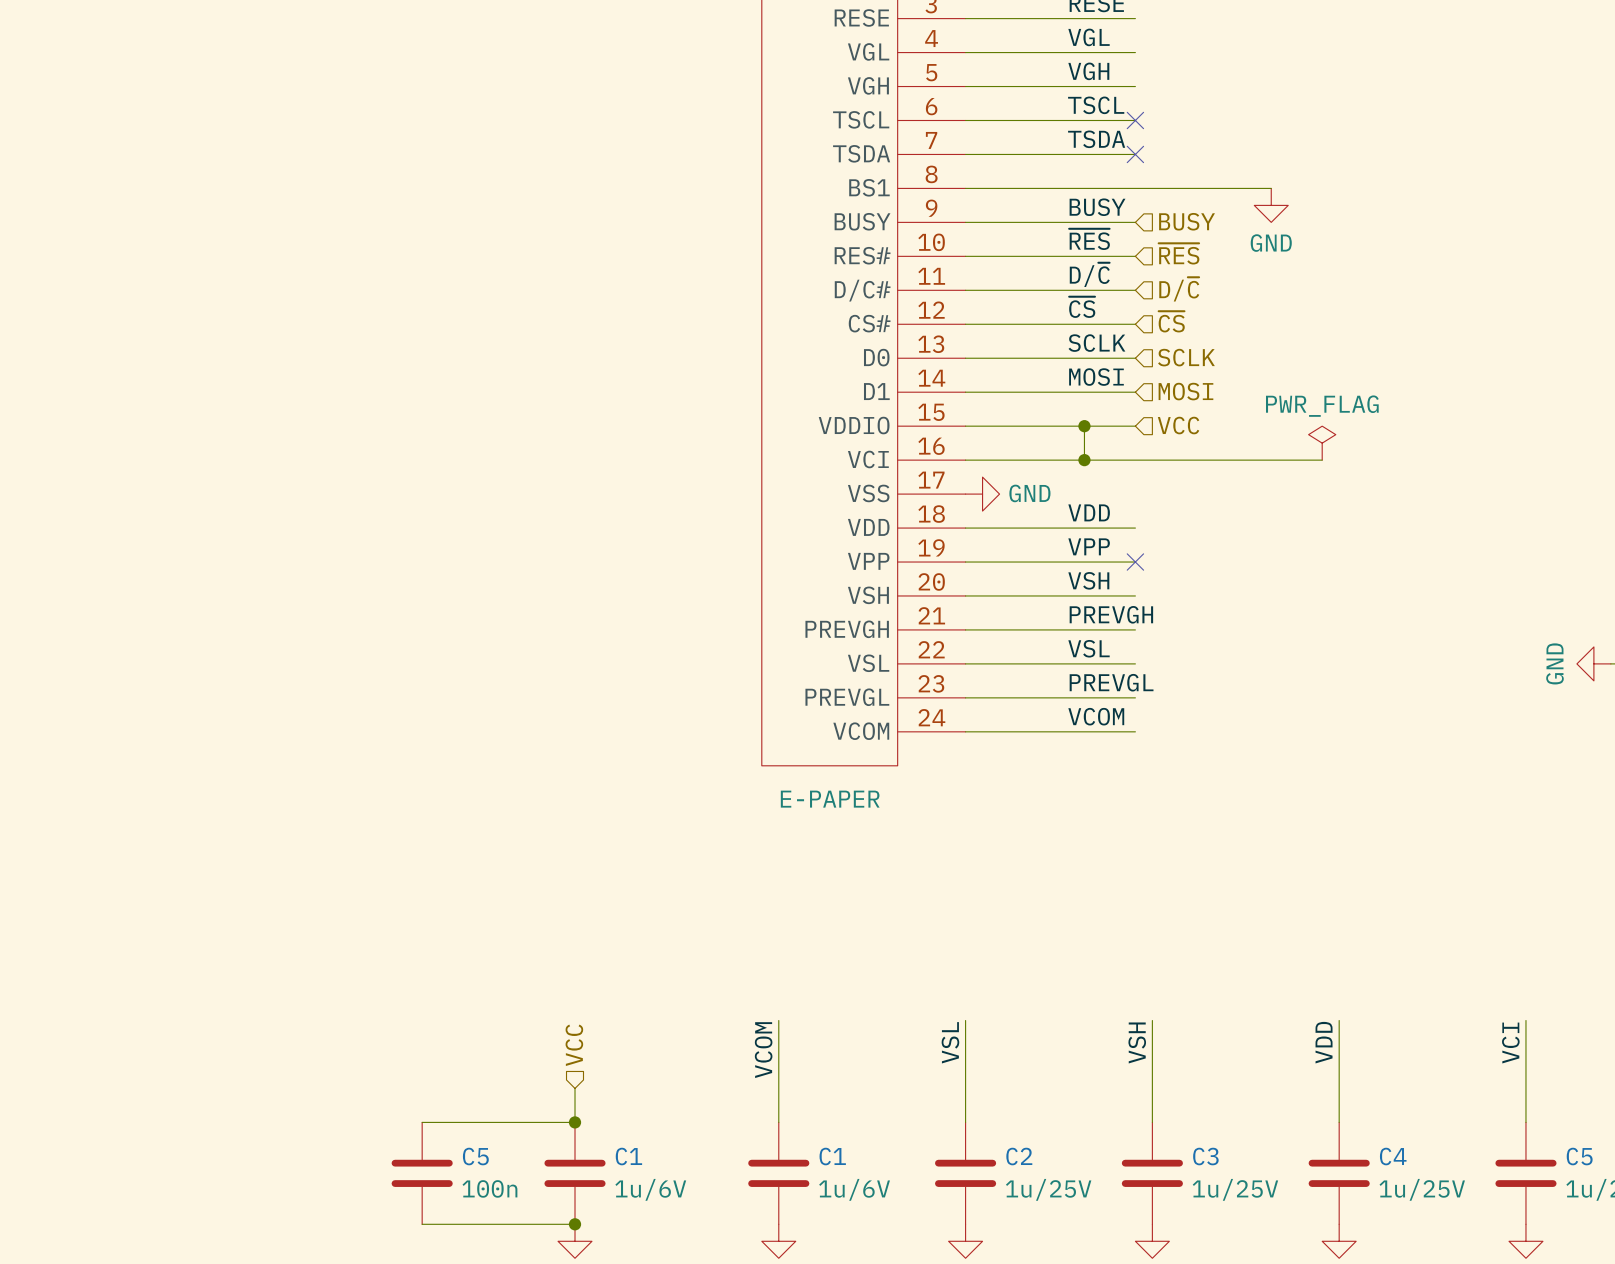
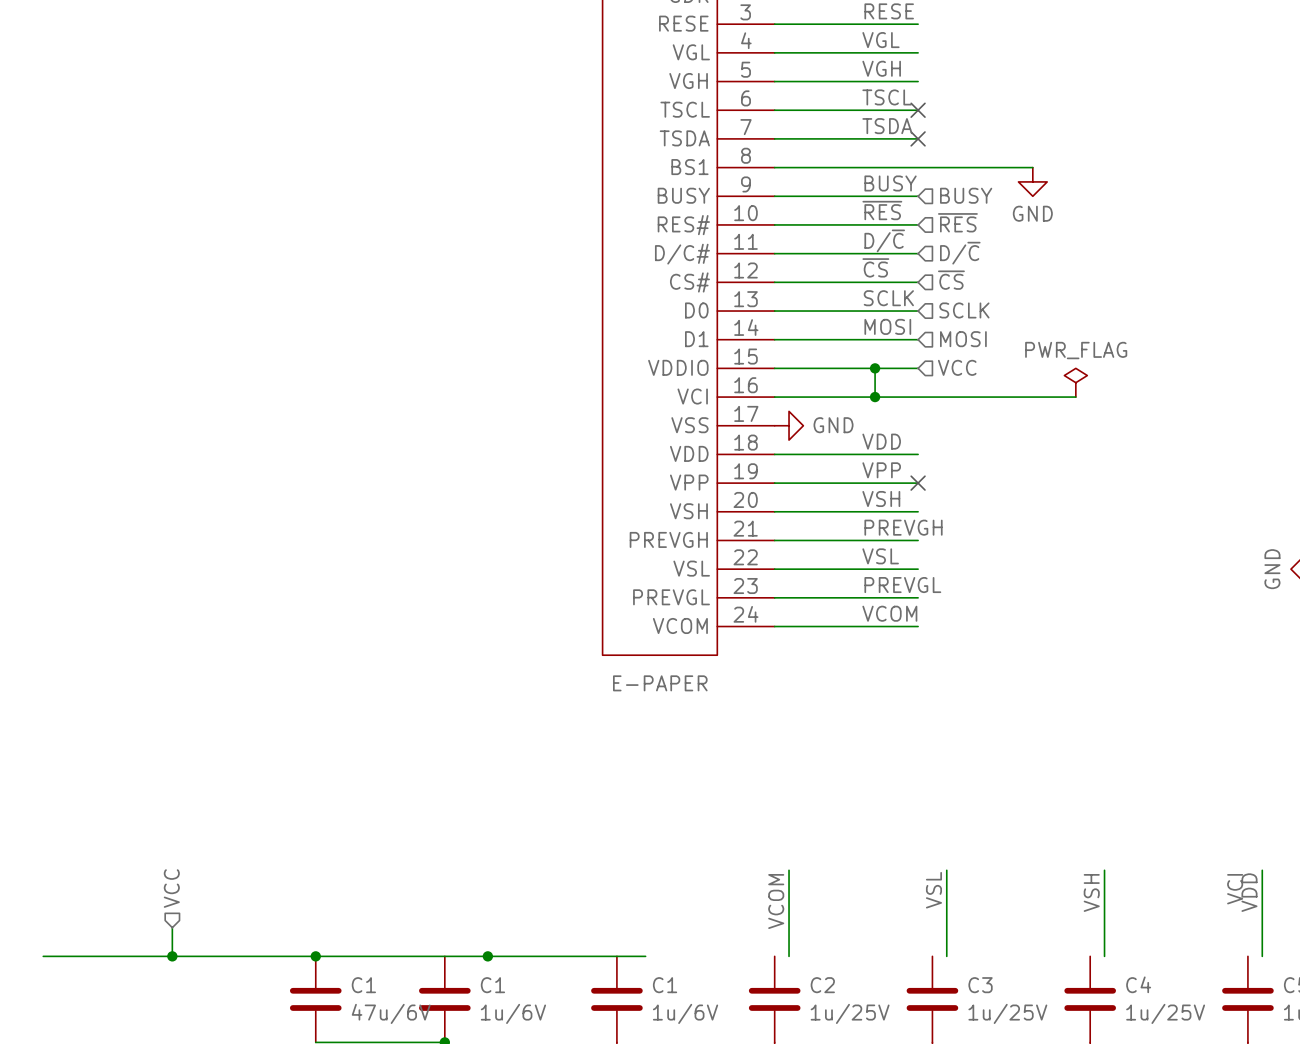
wire: (778, 1020) (778, 1122) -> none
wire: (965, 1020) (965, 1122) -> (789, 870) (789, 956)
wire: (1152, 1020) (1152, 1122) -> (946, 870) (946, 956)
wire: (1339, 1020) (1339, 1122) -> (1104, 870) (1104, 956)
wire: (1525, 1020) (1525, 1122) -> (1262, 870) (1262, 956)
label position: VSL (950, 1042) -> VSL (933, 890)
label position: VSH (1137, 1042) -> VSH (1091, 892)
label position: VDD (1324, 1042) -> VDD (1249, 892)
hierarchical label position: VCC (574, 1045) -> VCC (171, 888)
label position: VCOM (763, 1050) -> VCOM (776, 901)
wire: none -> (172, 927) (172, 956)
wire: (575, 1088) (575, 1122) -> (645, 956) (444, 956)
wire: none -> (43, 956) (315, 956)
junction: none -> (172, 956)
junction: none -> (315, 956)
junction position: (575, 1122) -> (487, 956)
C5 name: C5 (475, 1156) -> C1 (363, 985)
C5 value: 100n (489, 1188) -> 47u/6V (391, 1013)

